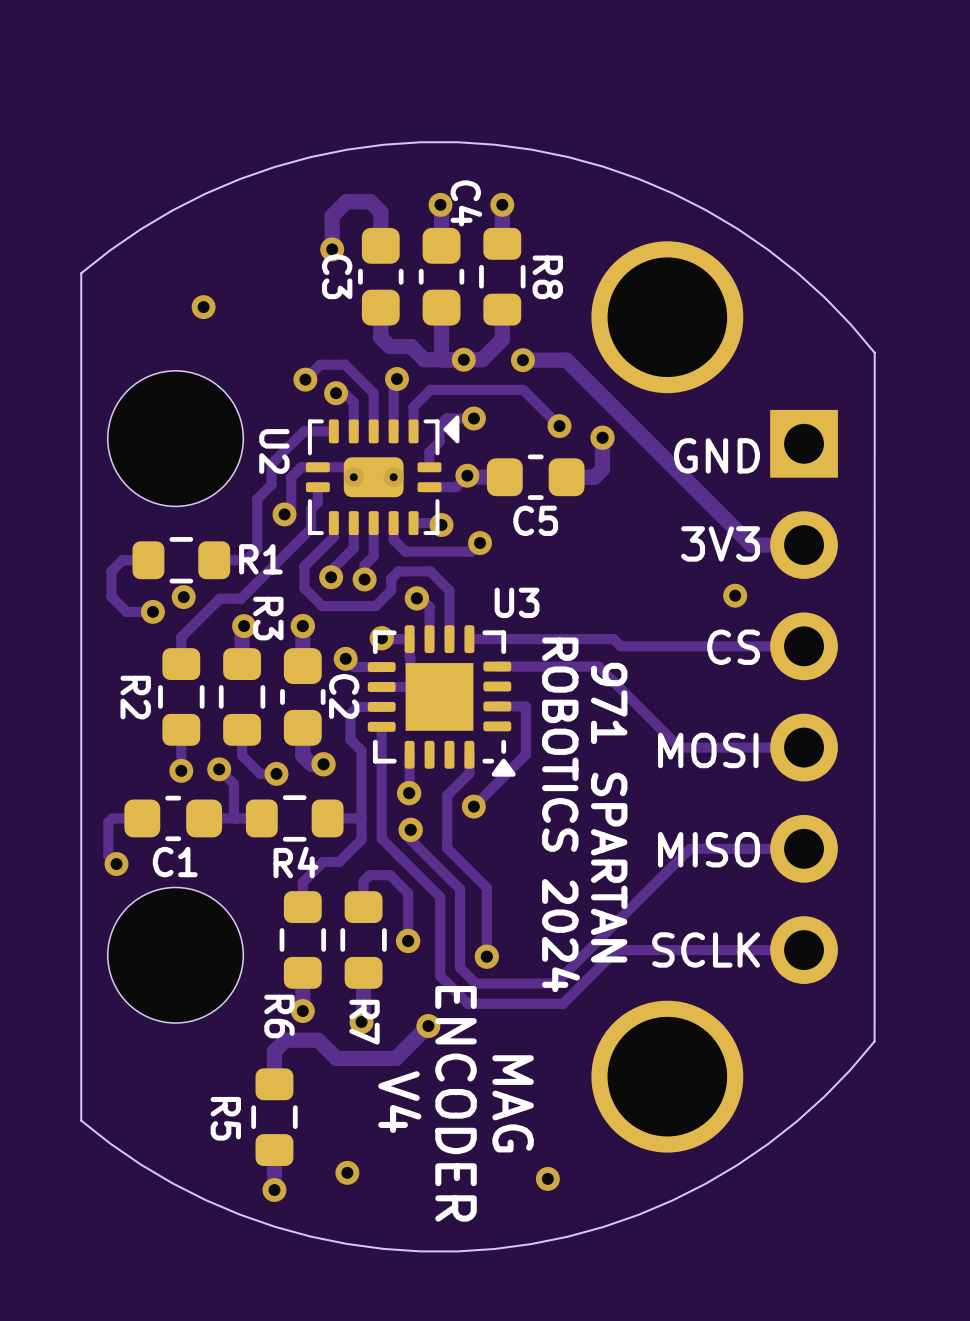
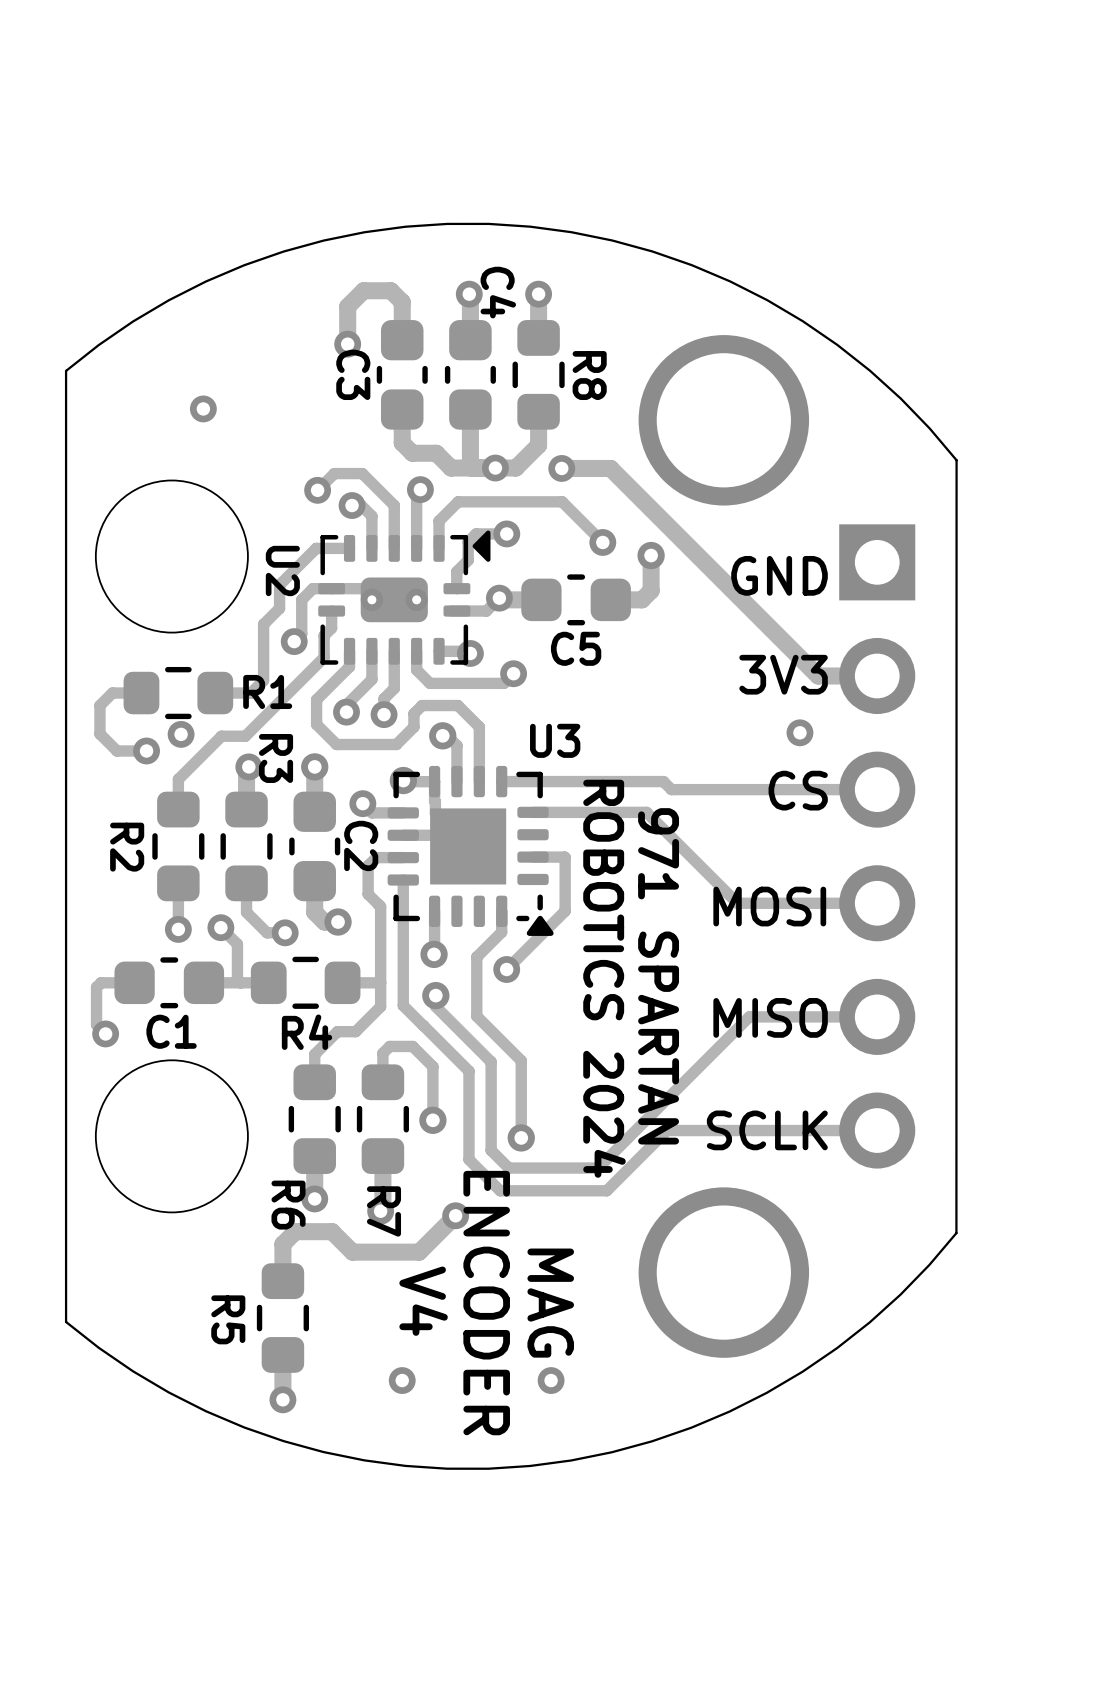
via position: (347, 1172) -> (402, 1380)
via position: (547, 1178) -> (551, 1380)

